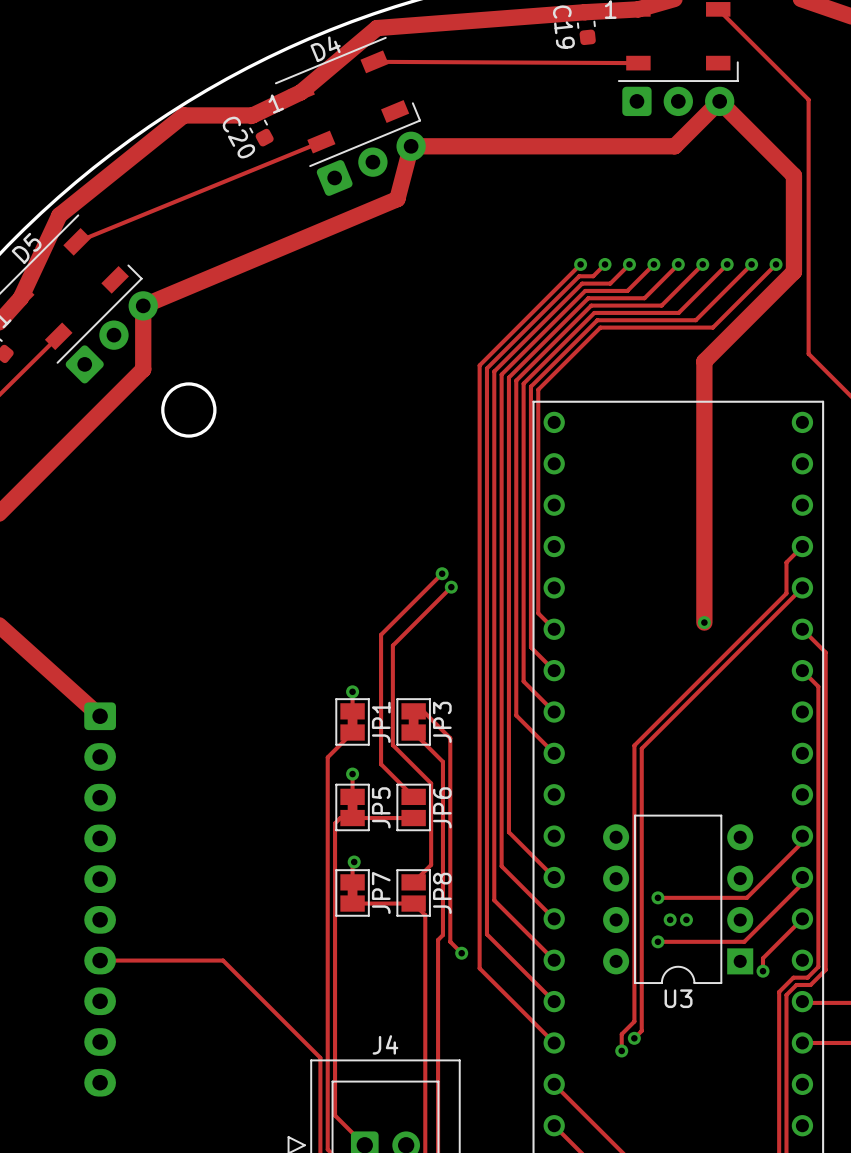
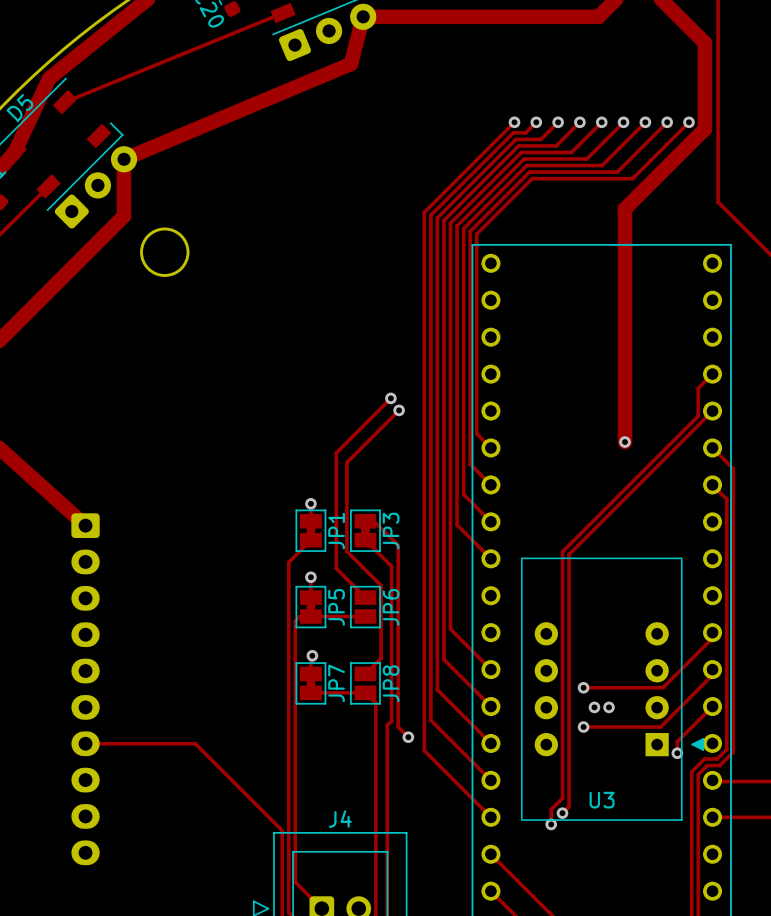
U3 footprint: [603, 814, 754, 985] -> [521, 557, 705, 821]

